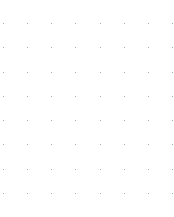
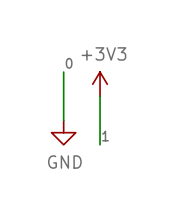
label: none -> 0 (69, 63)
wire: none -> (63, 72) (63, 120)
power symbol: none -> +3V3 (100, 84)
wire: none -> (100, 96) (100, 144)
power symbol: none -> GND (63, 132)
label: none -> 1 (105, 136)

